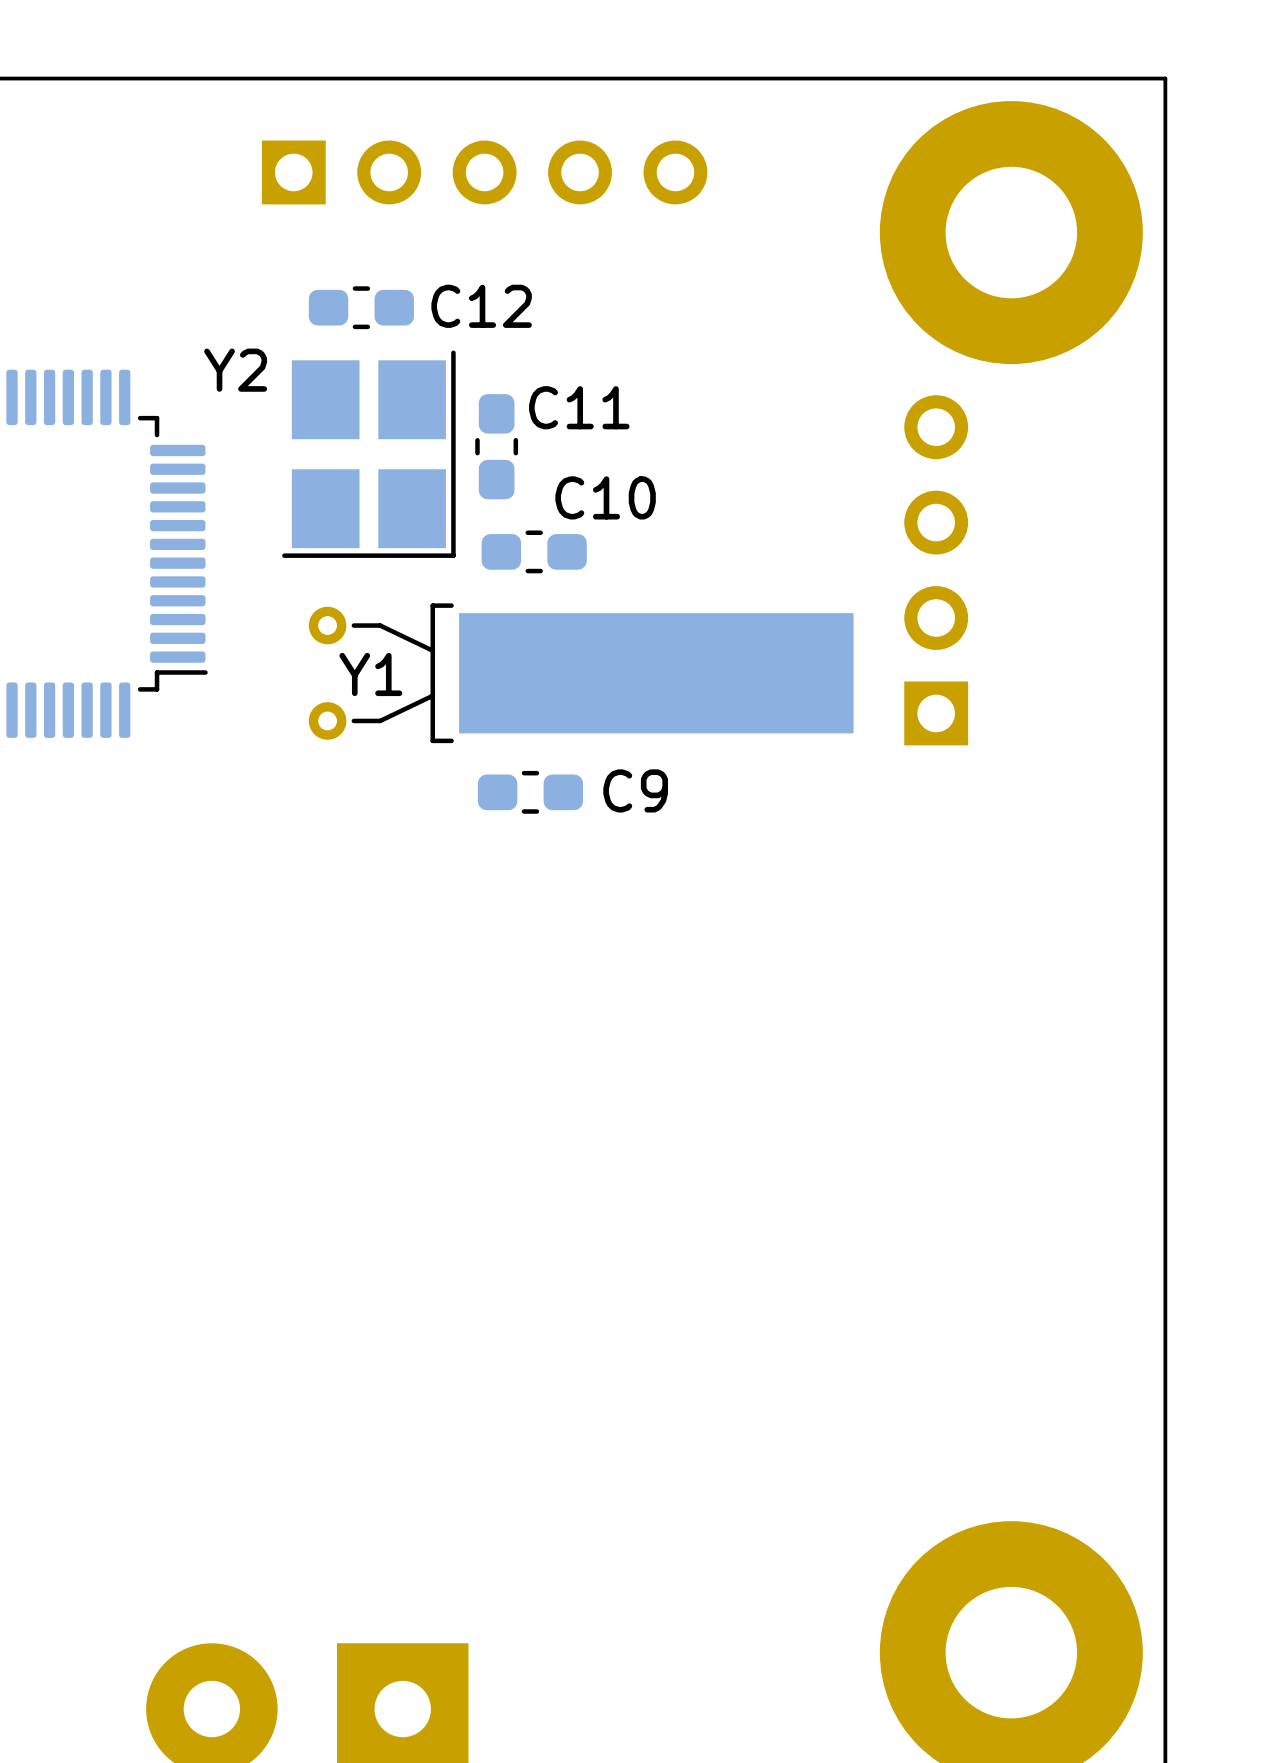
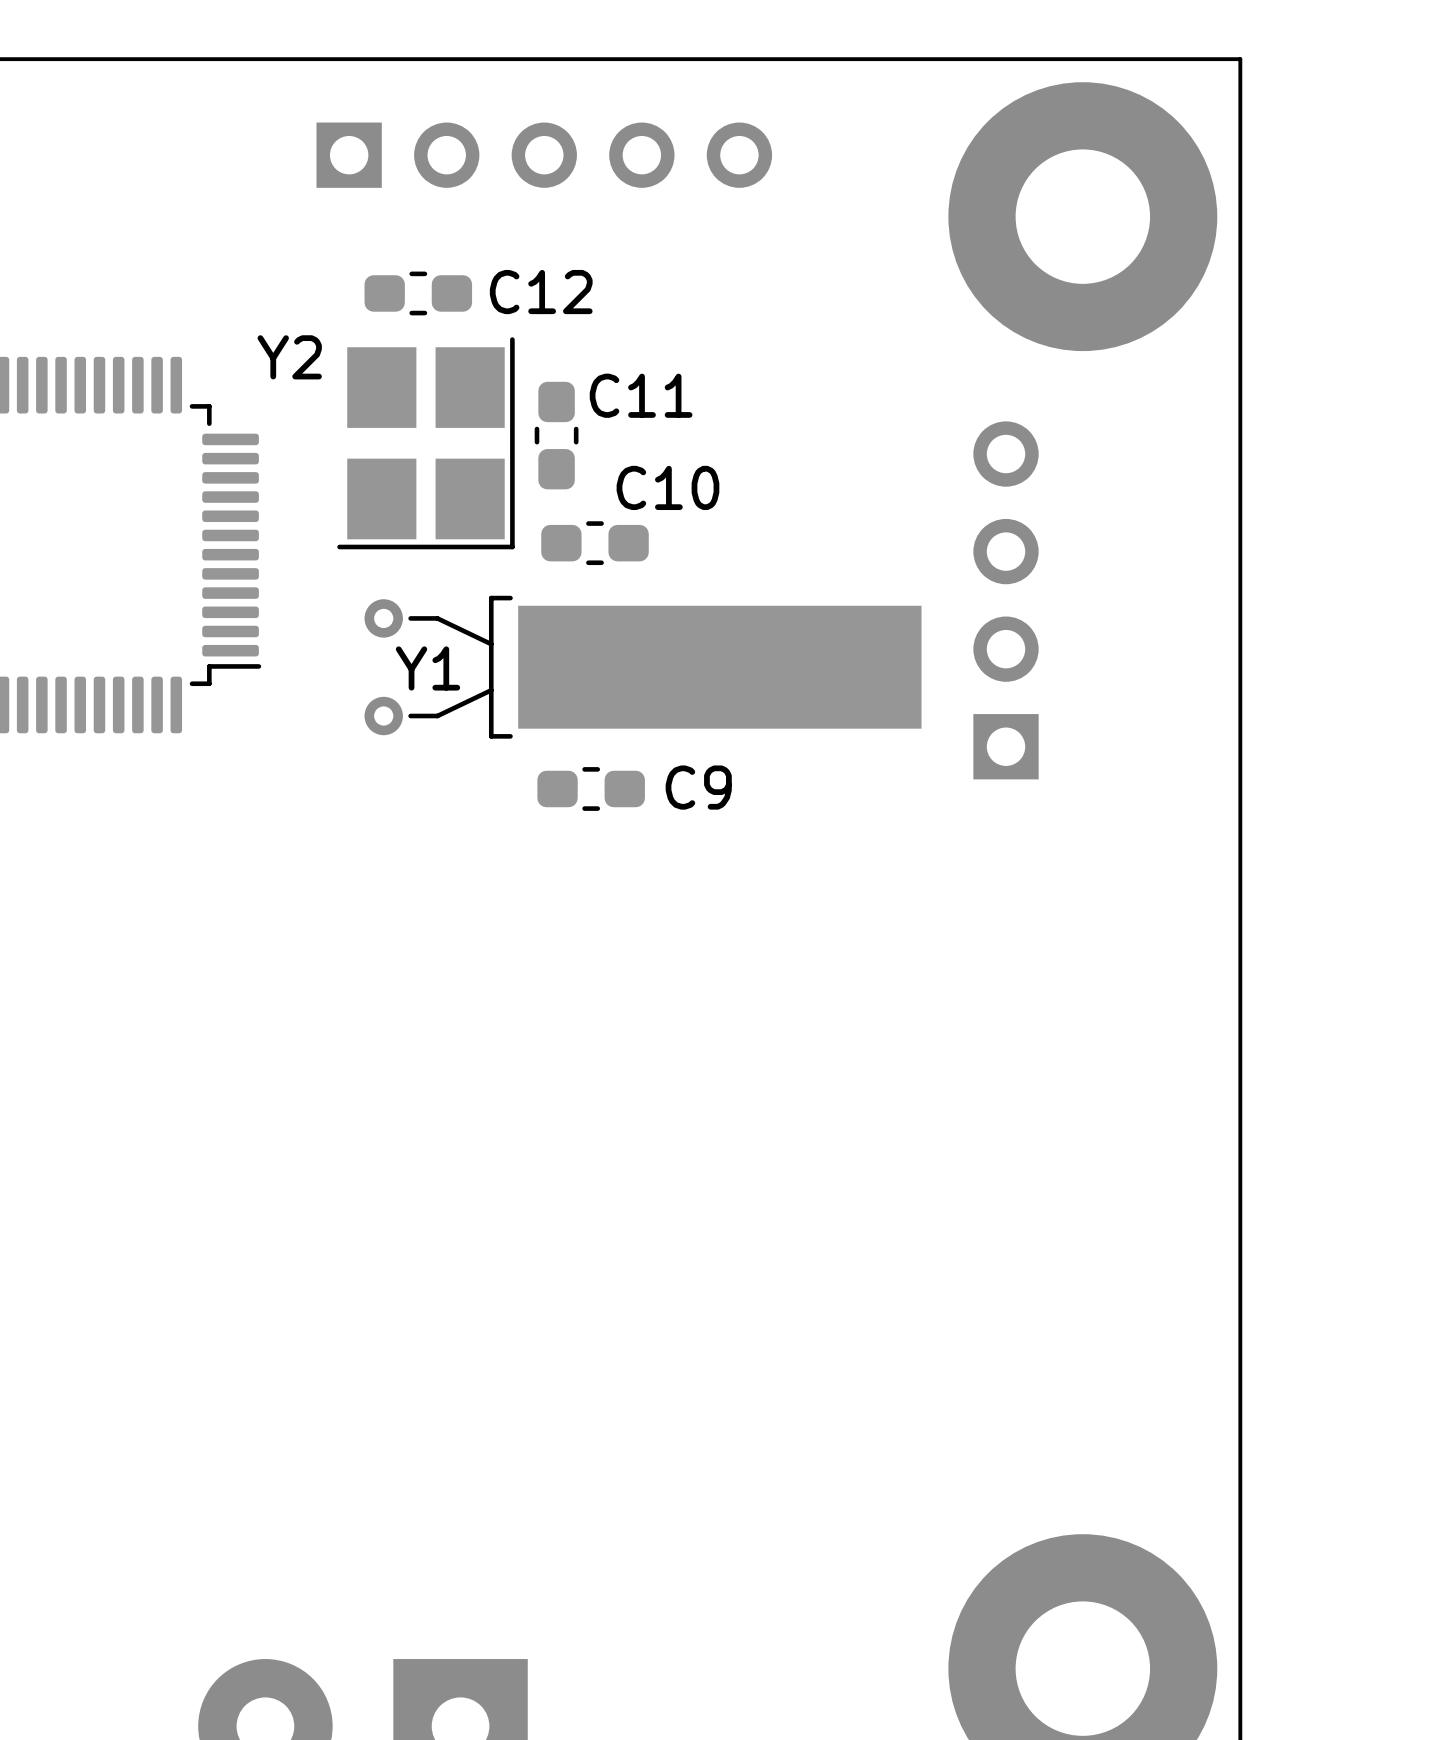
part position: (936, 570) -> (1006, 600)

